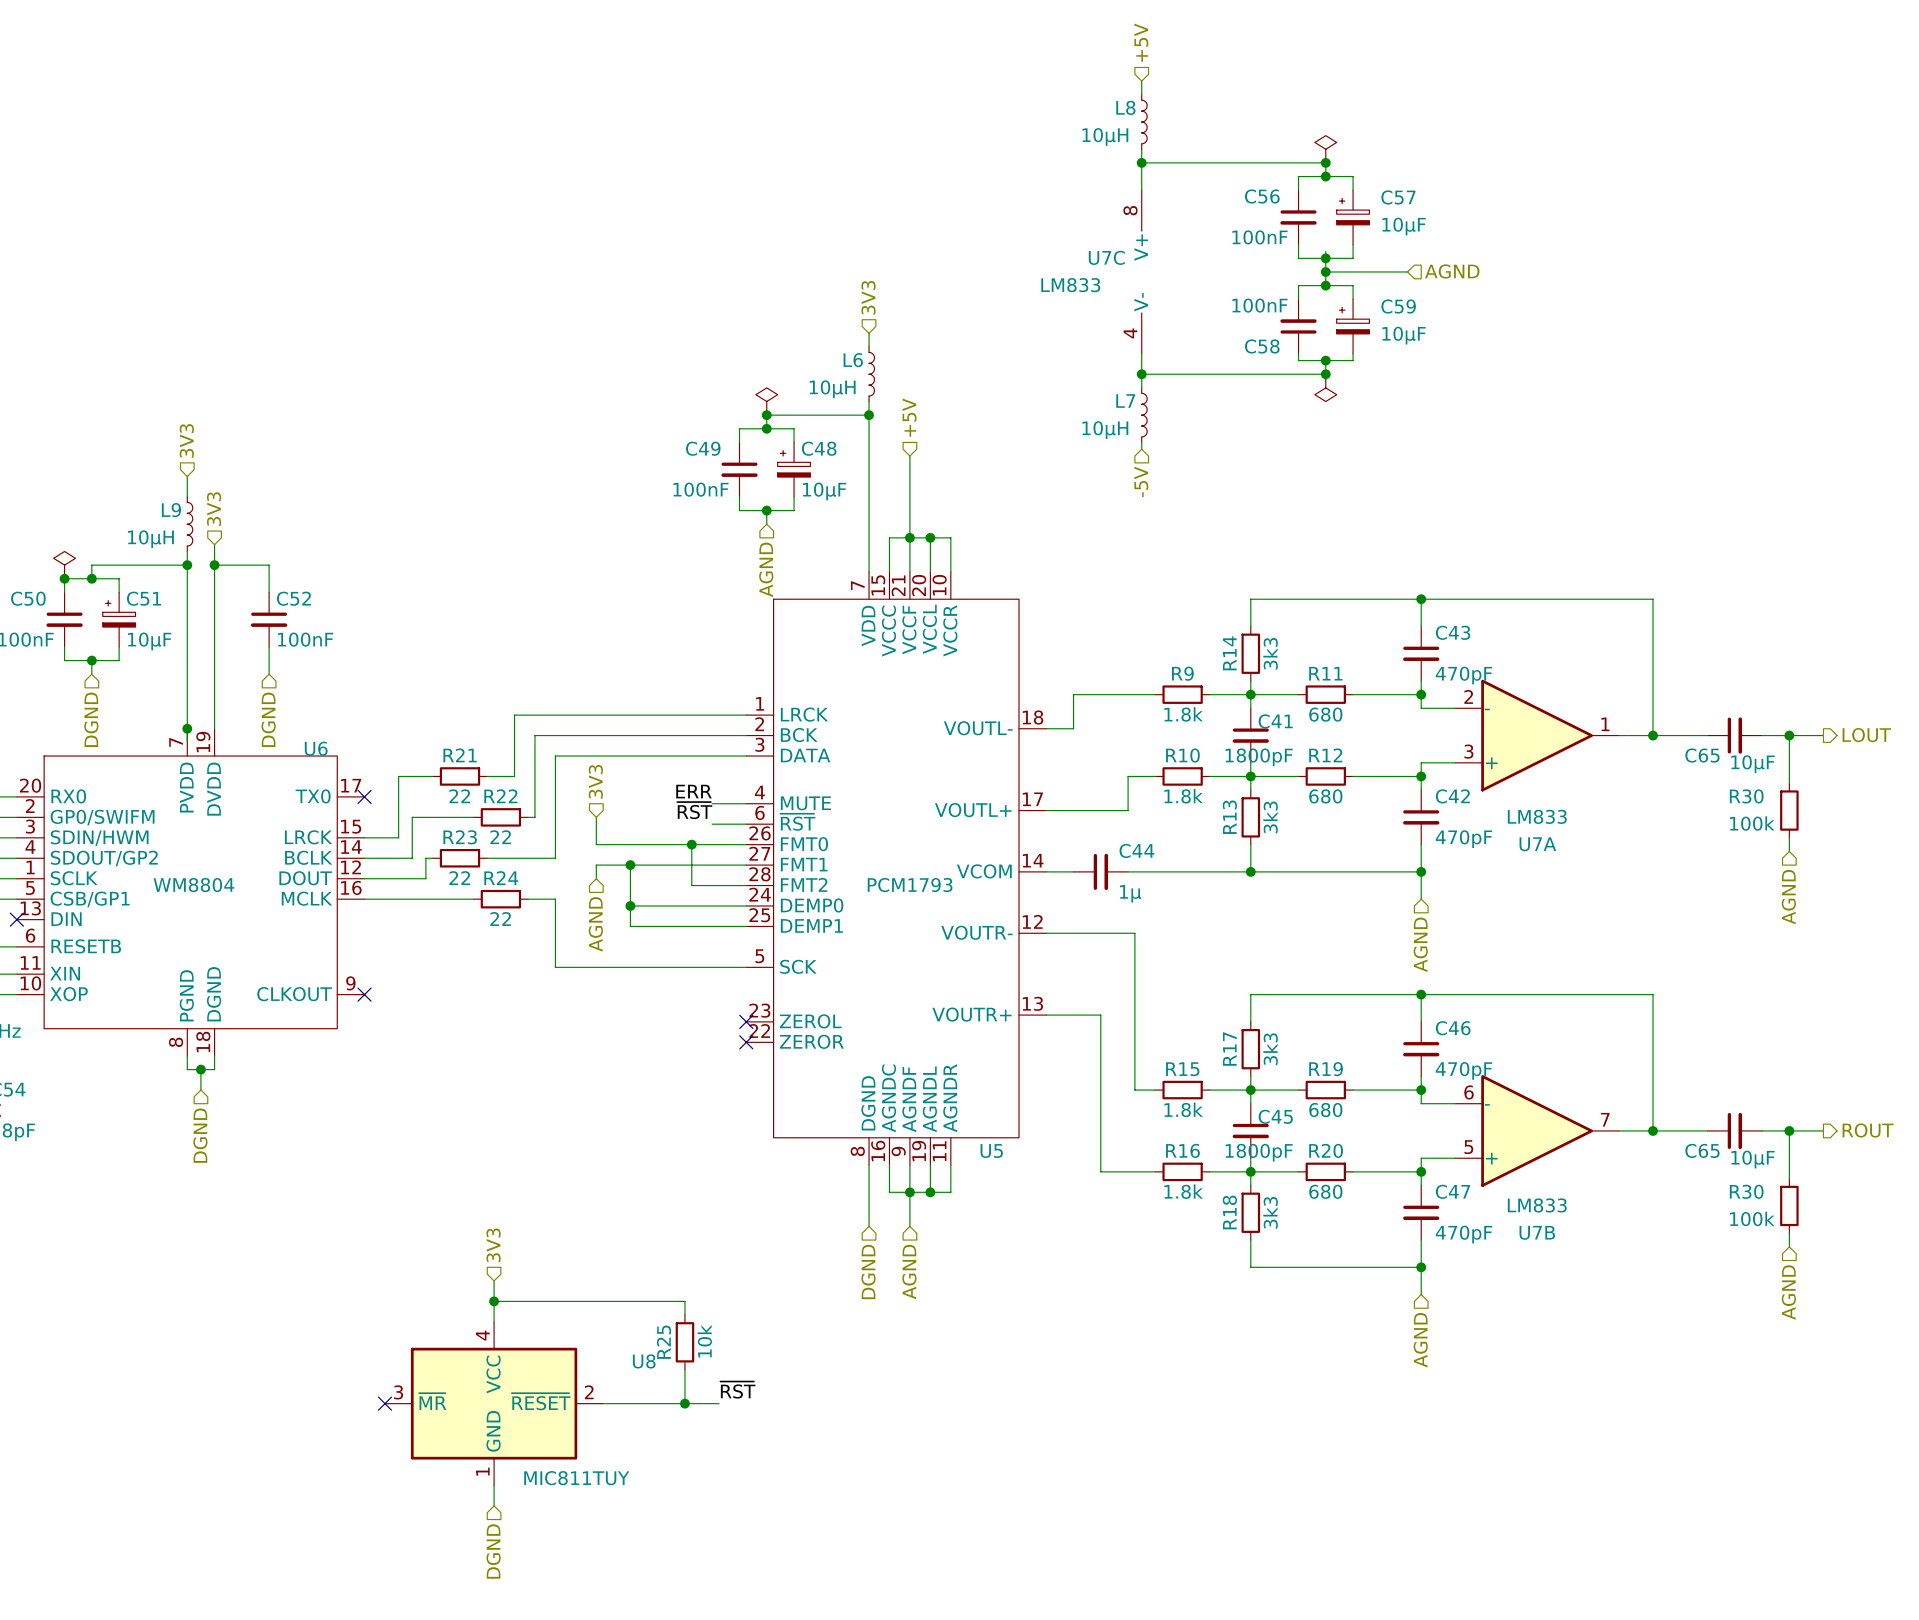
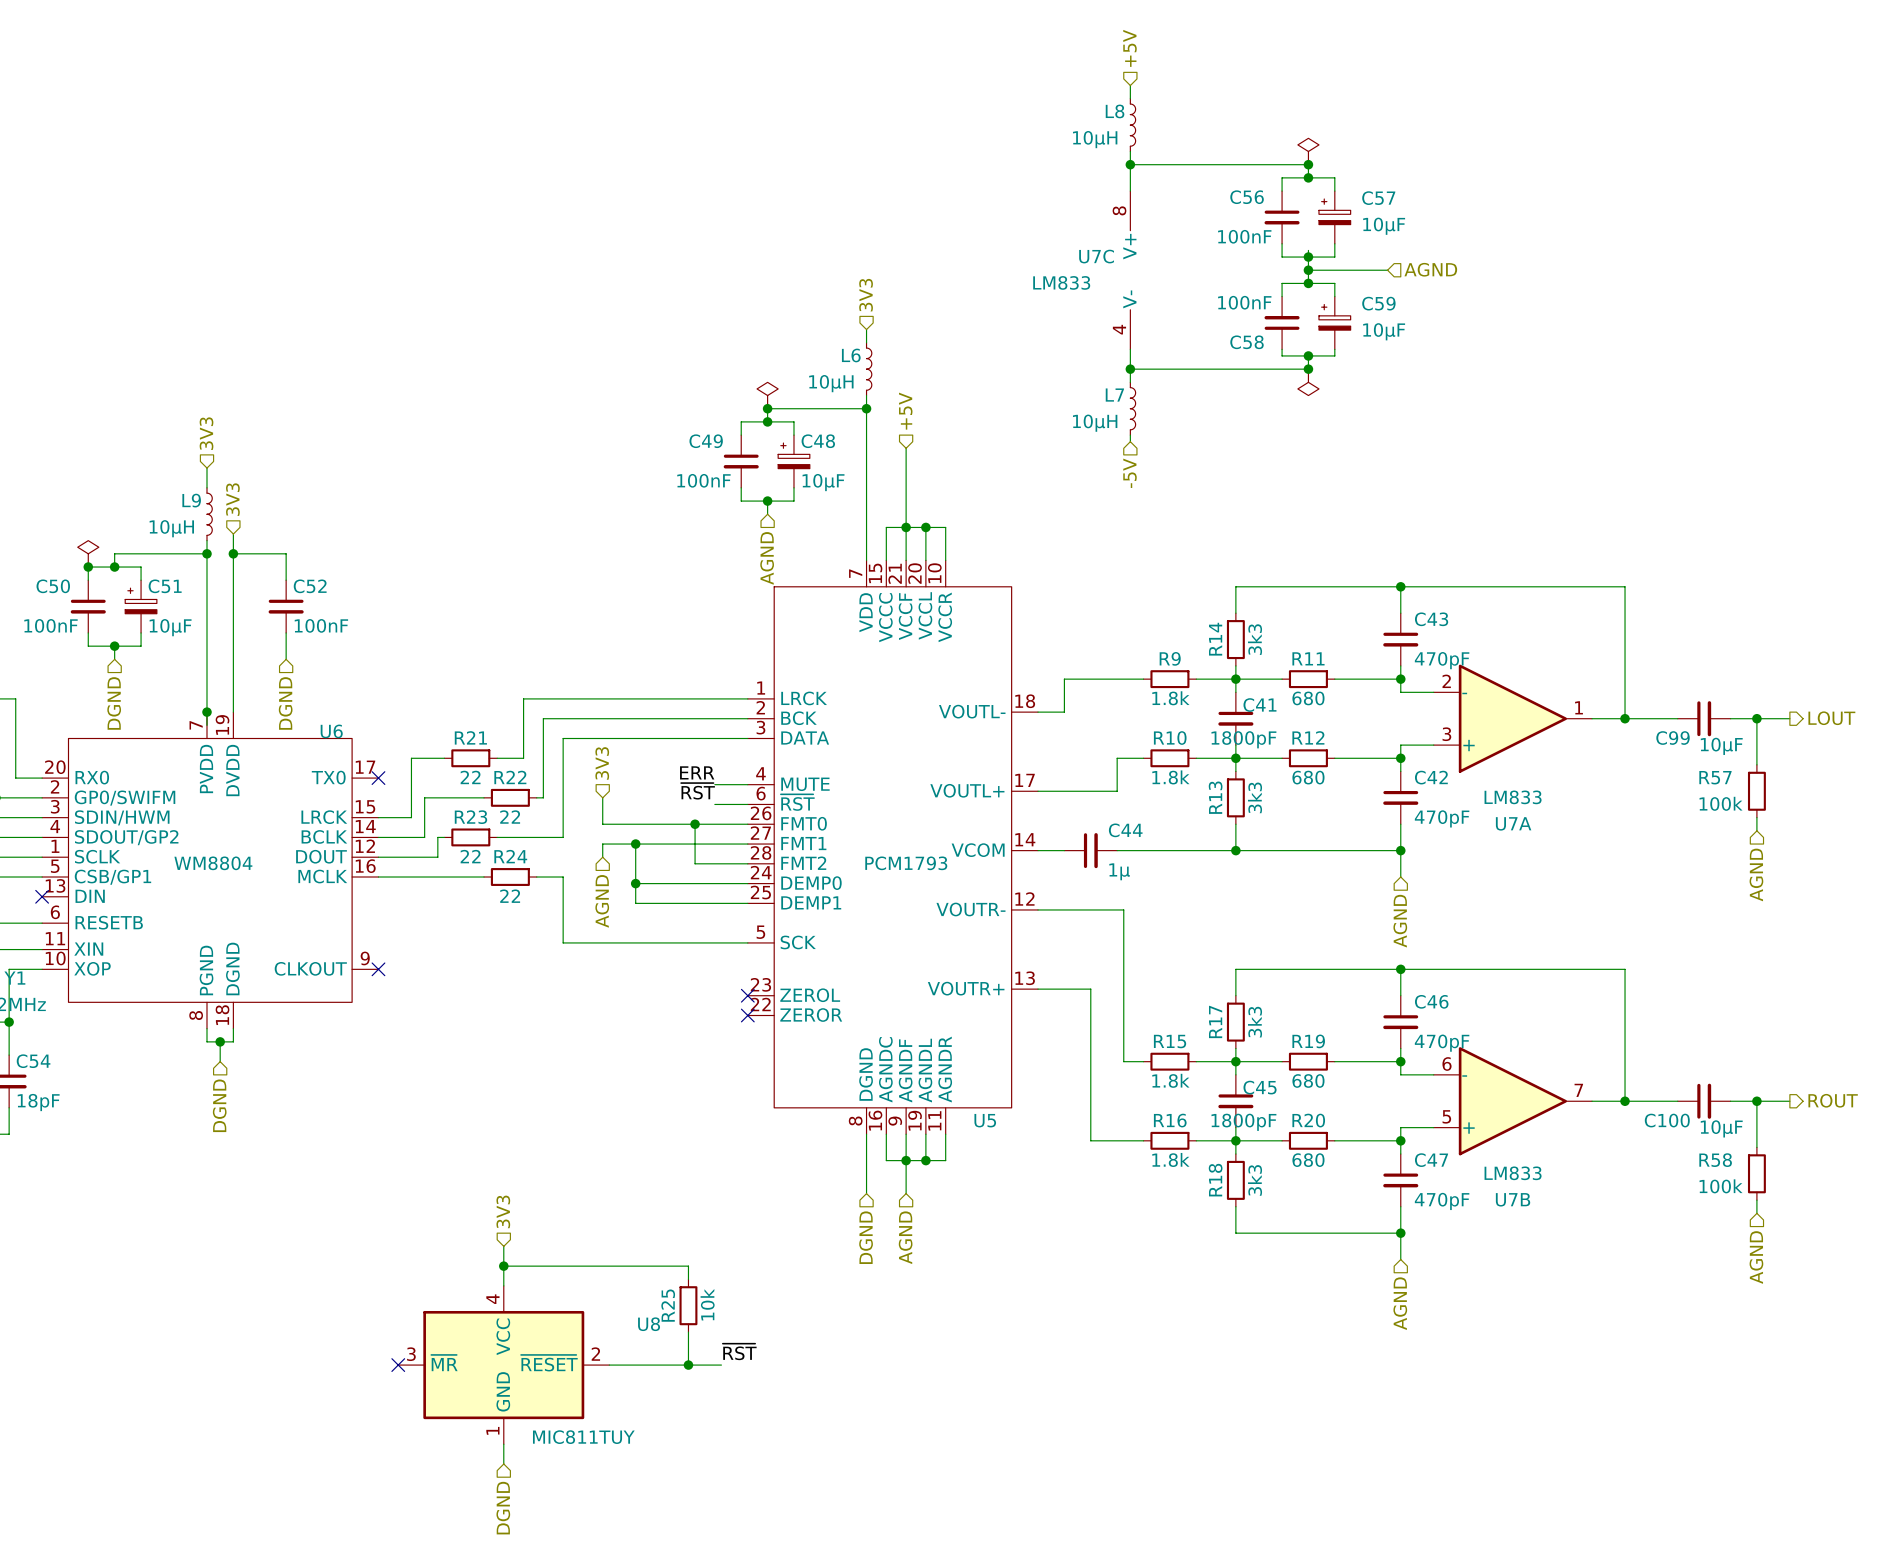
C65 name: C65 (1702, 755) -> C99 (1673, 738)
R30 name: R30 (1746, 796) -> R57 (1715, 777)
C65 name: C65 (1702, 1150) -> C100 (1667, 1120)
R30 name: R30 (1746, 1191) -> R58 (1715, 1160)

